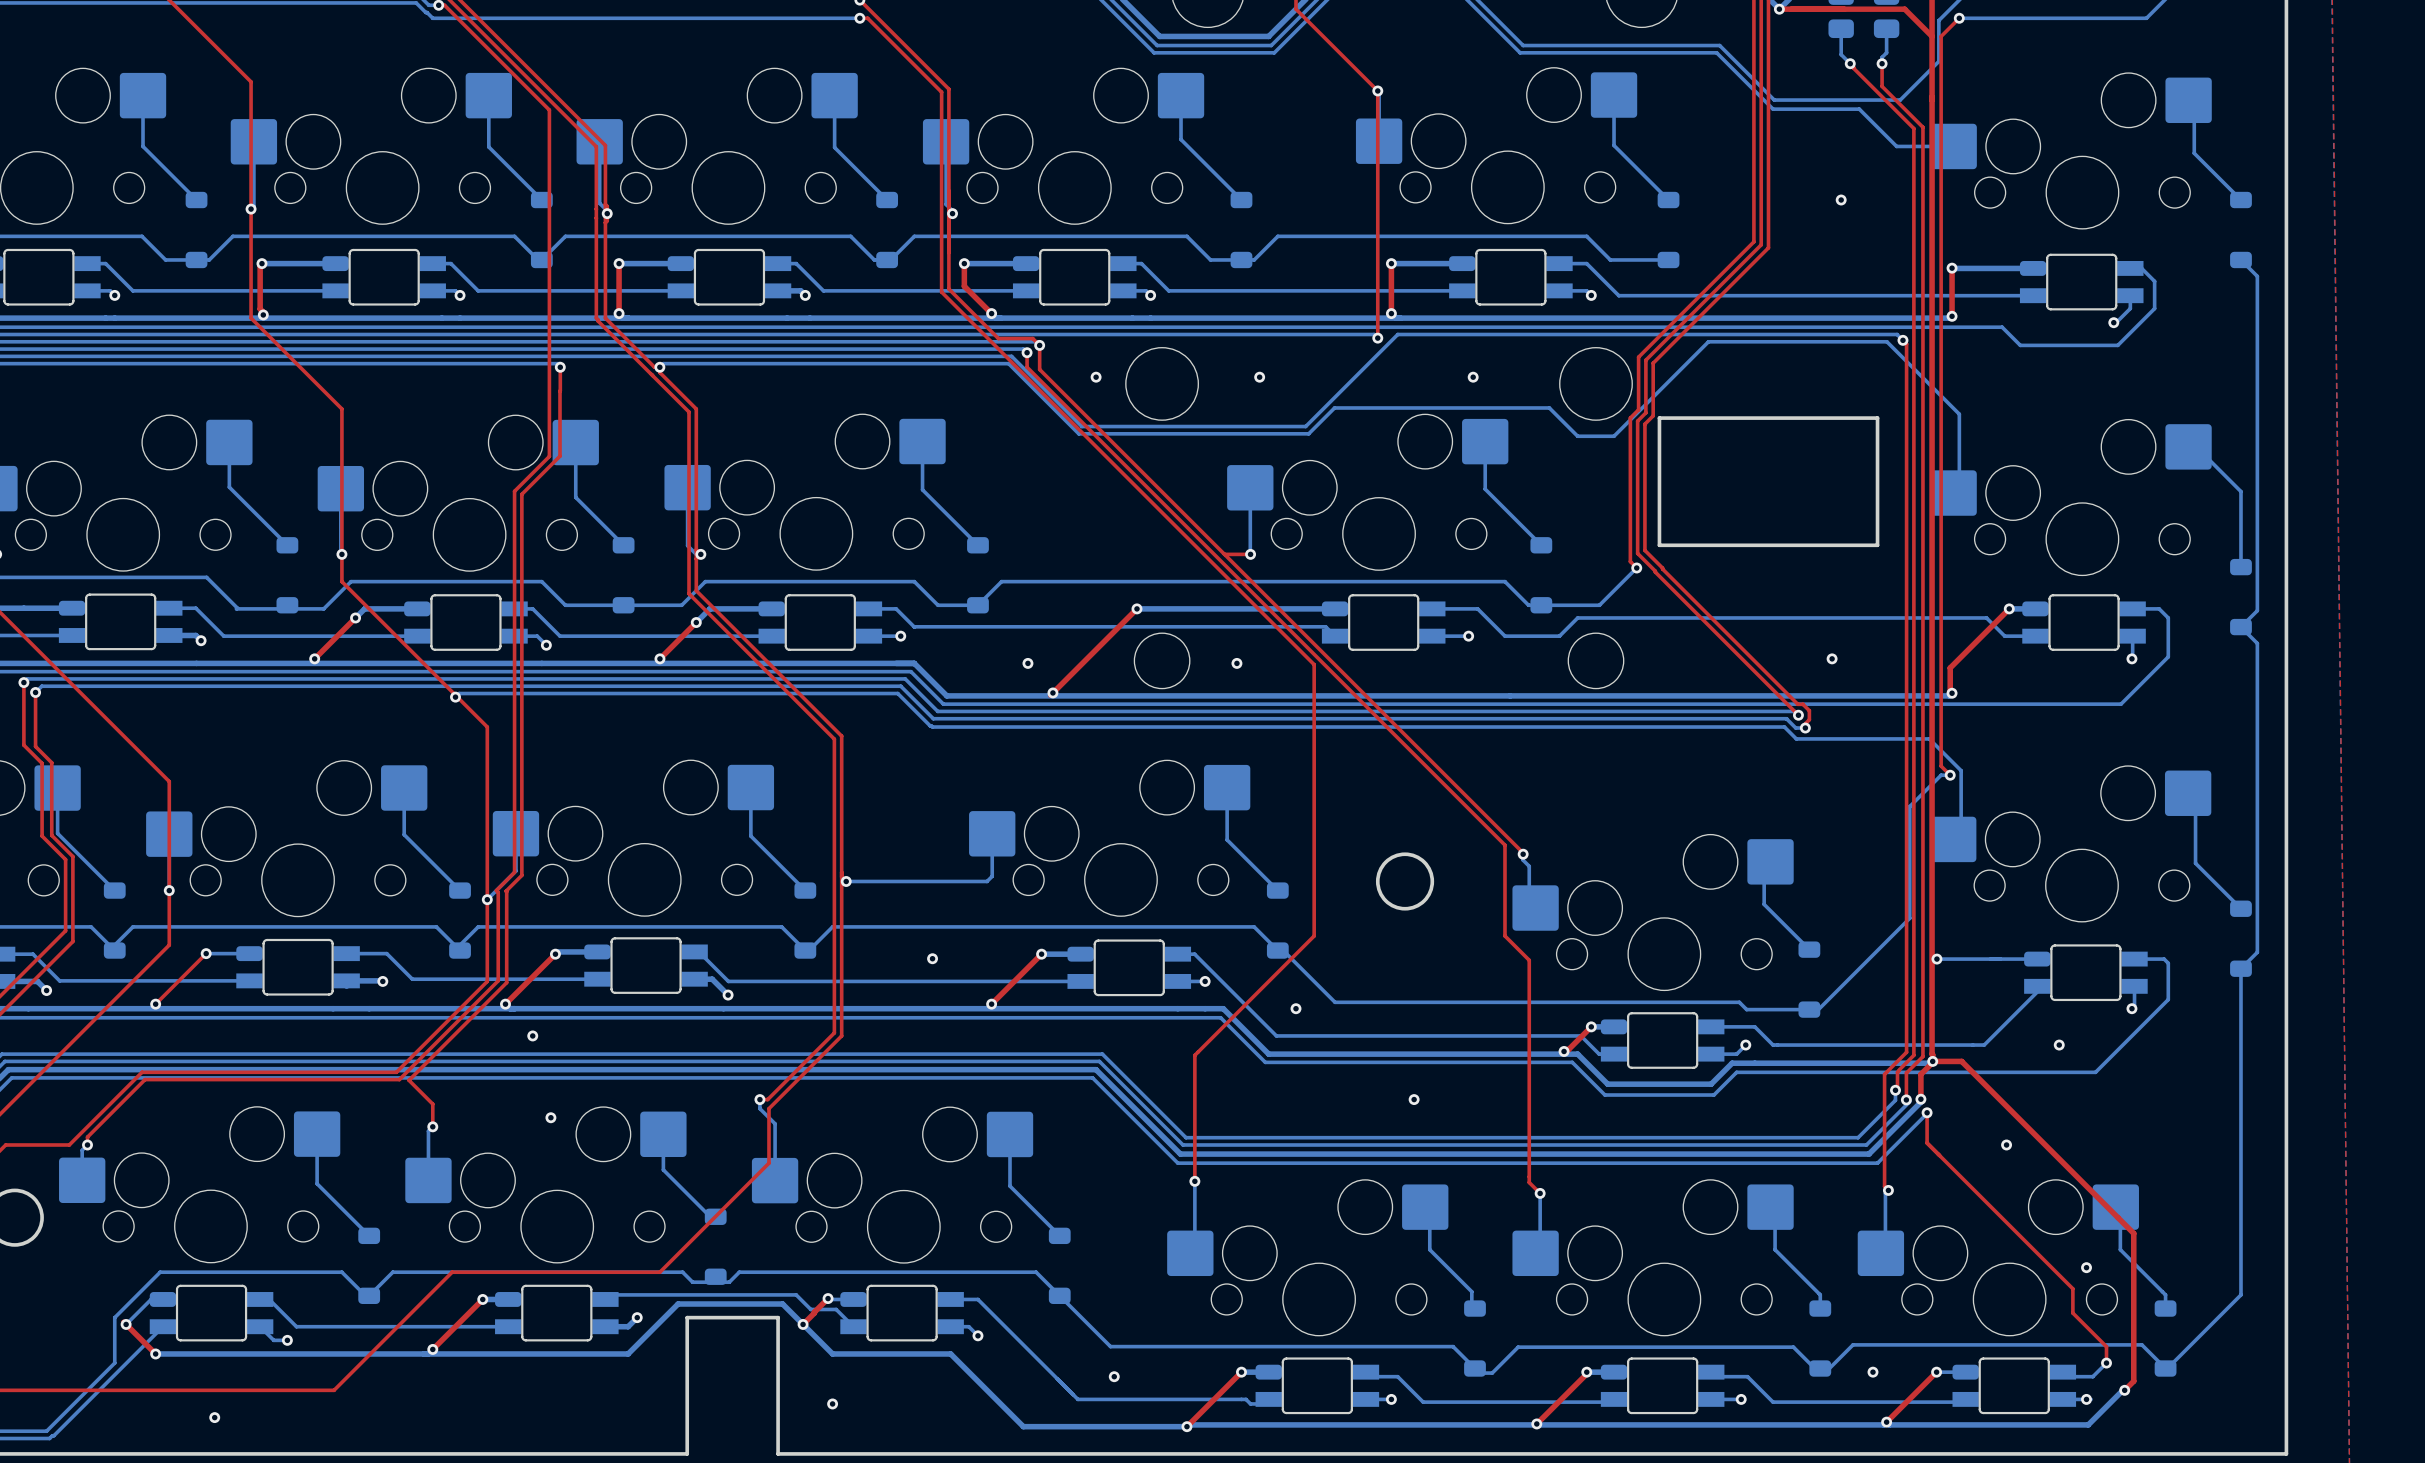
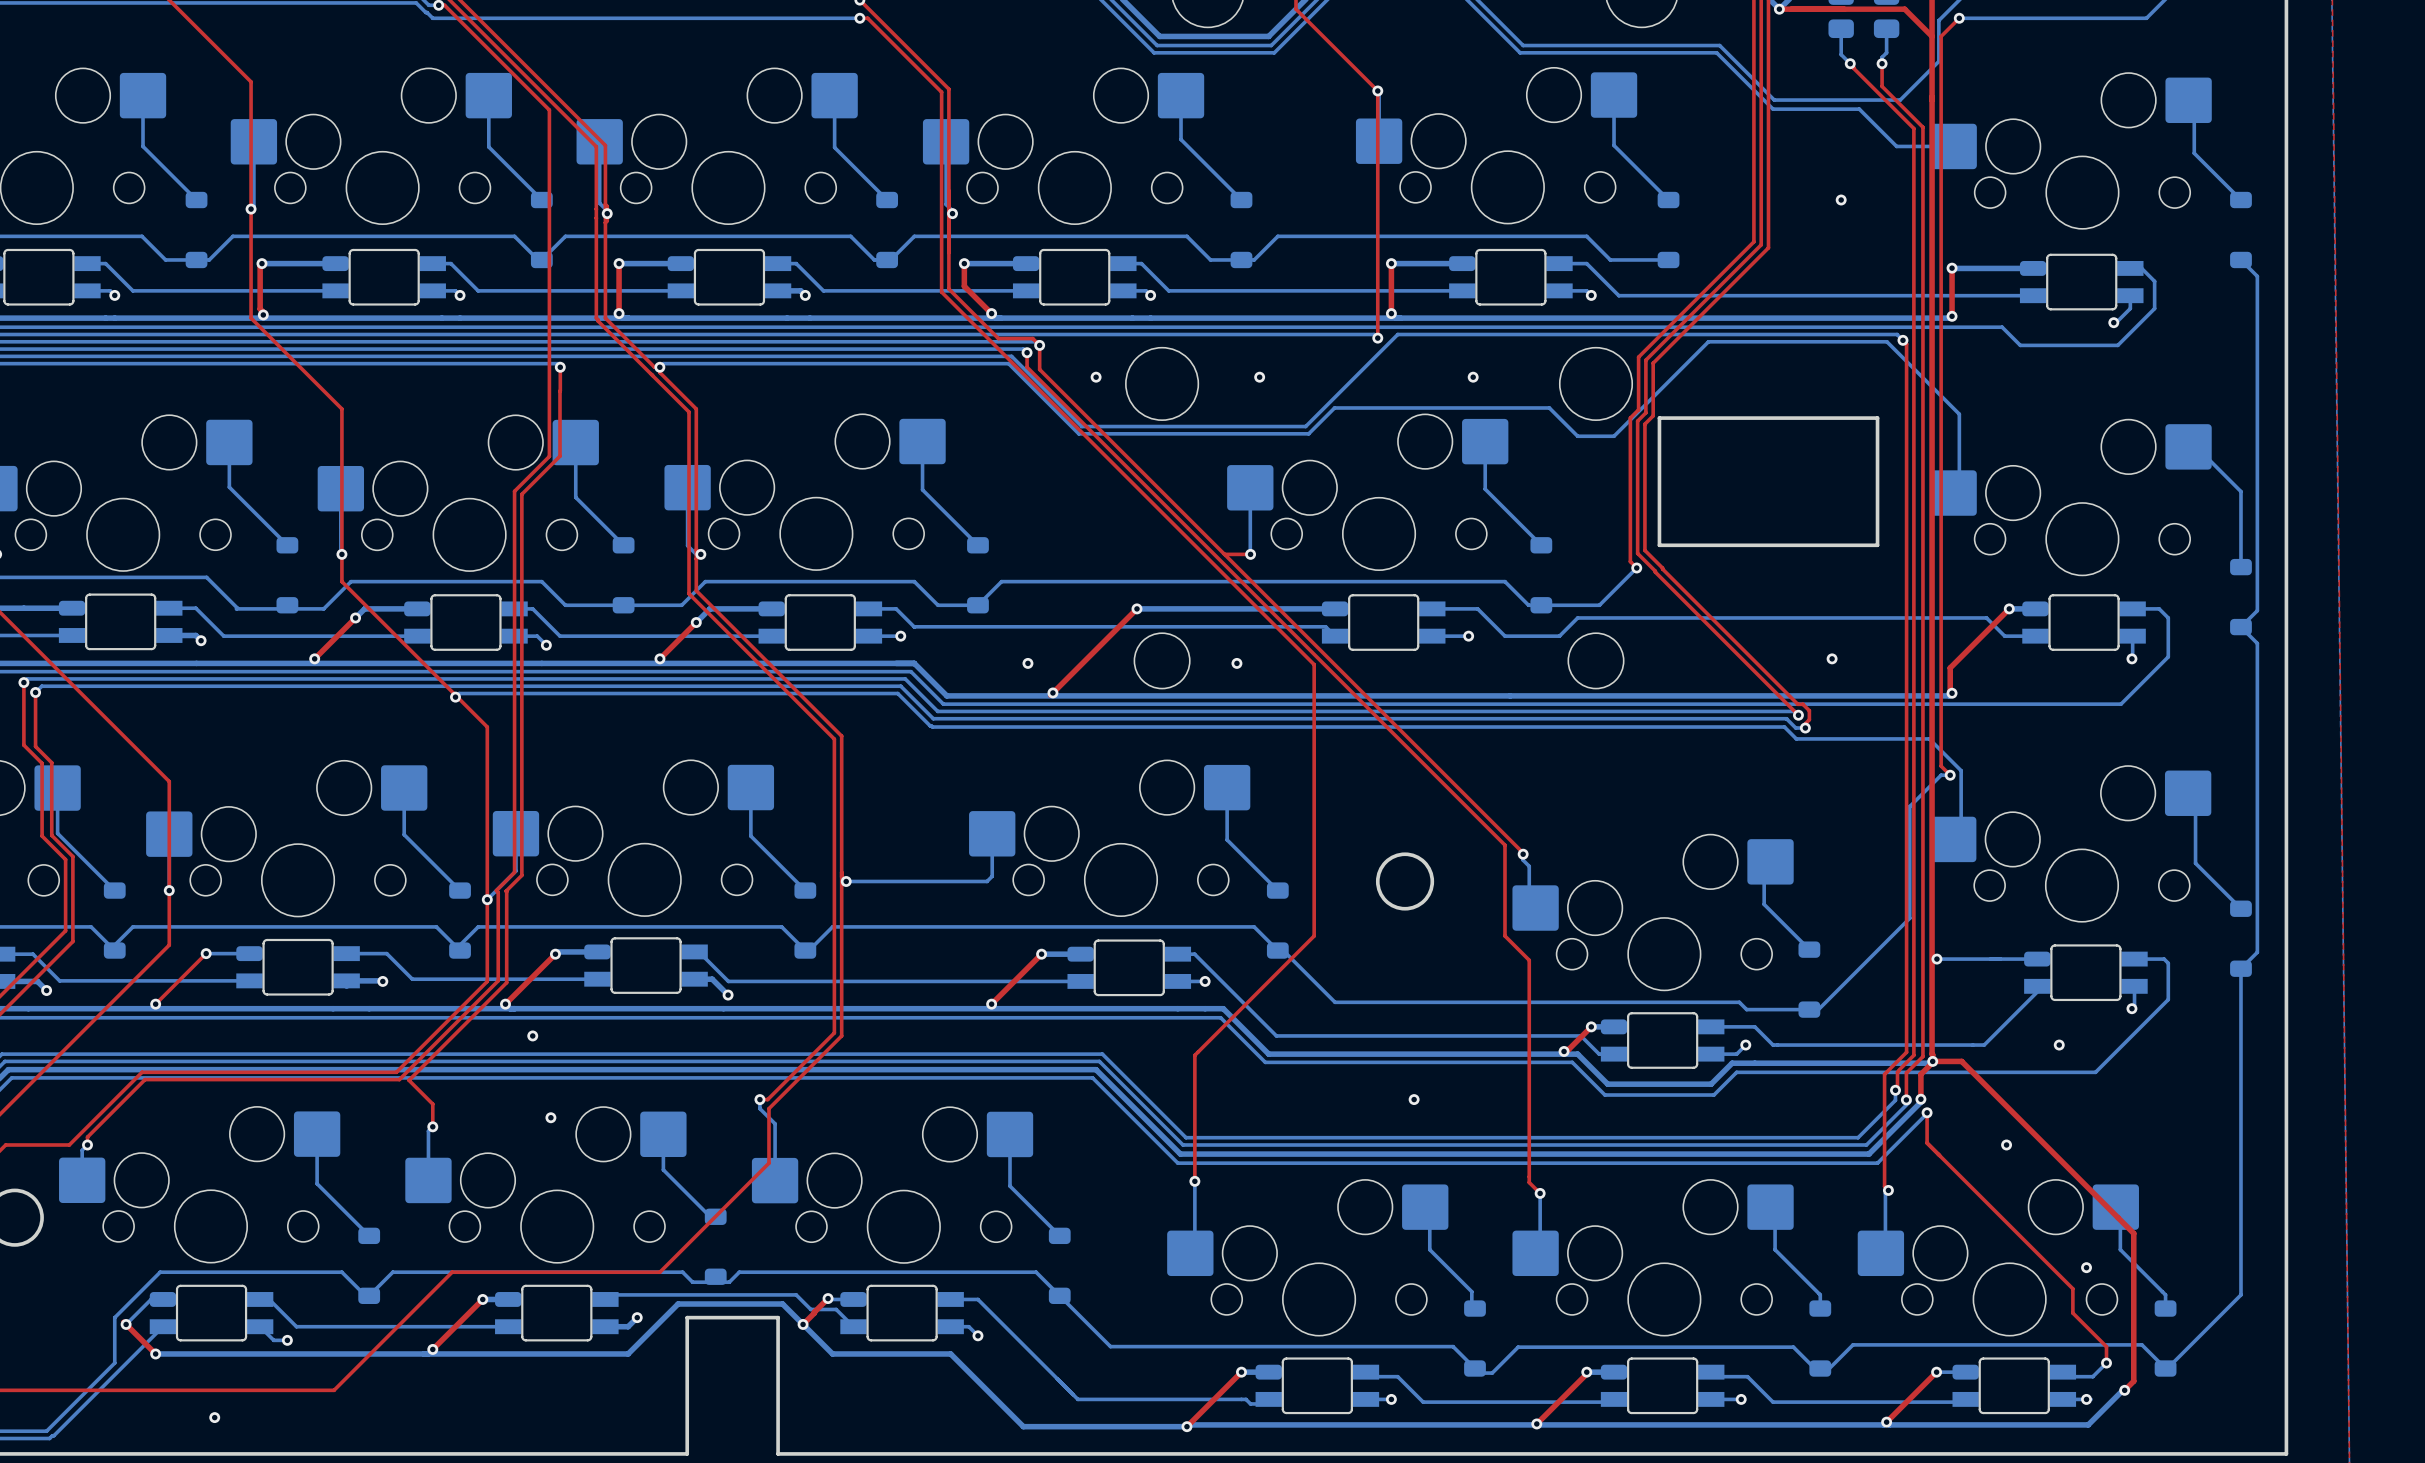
via: (932, 958) -> none
via: (1296, 1008) -> none
via: (1872, 1372) -> none
via: (1114, 1376) -> none
via: (832, 1403) -> none

